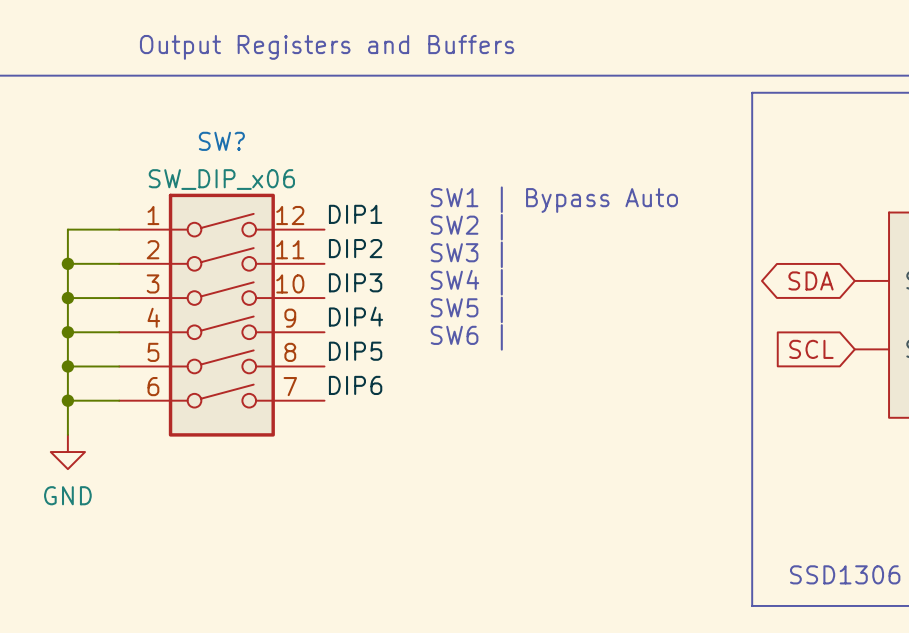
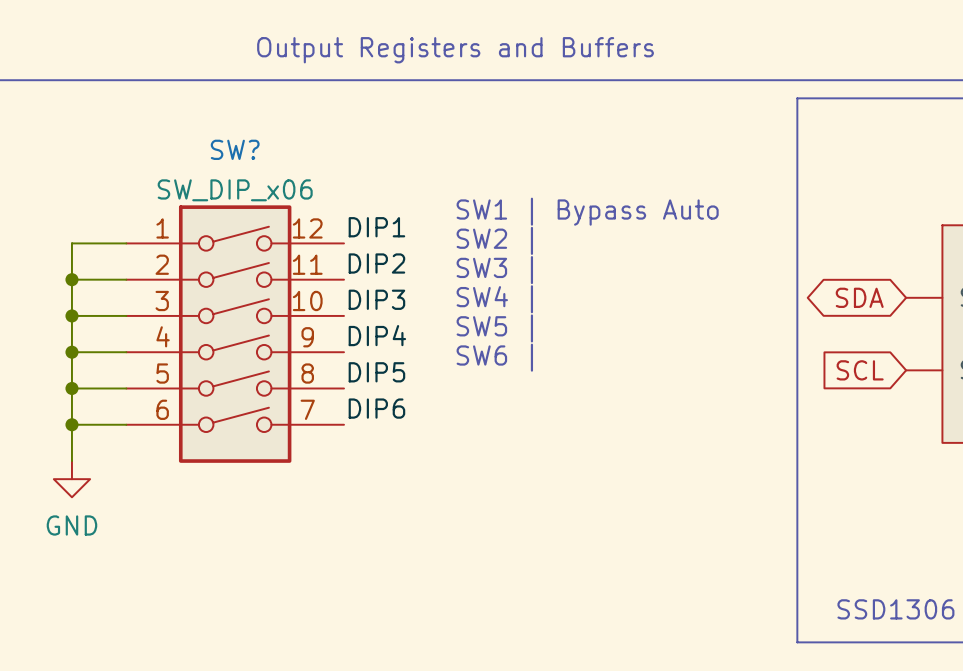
text position: Output Registers and Buffers (327, 47) -> Output Registers and Buffers (455, 50)

